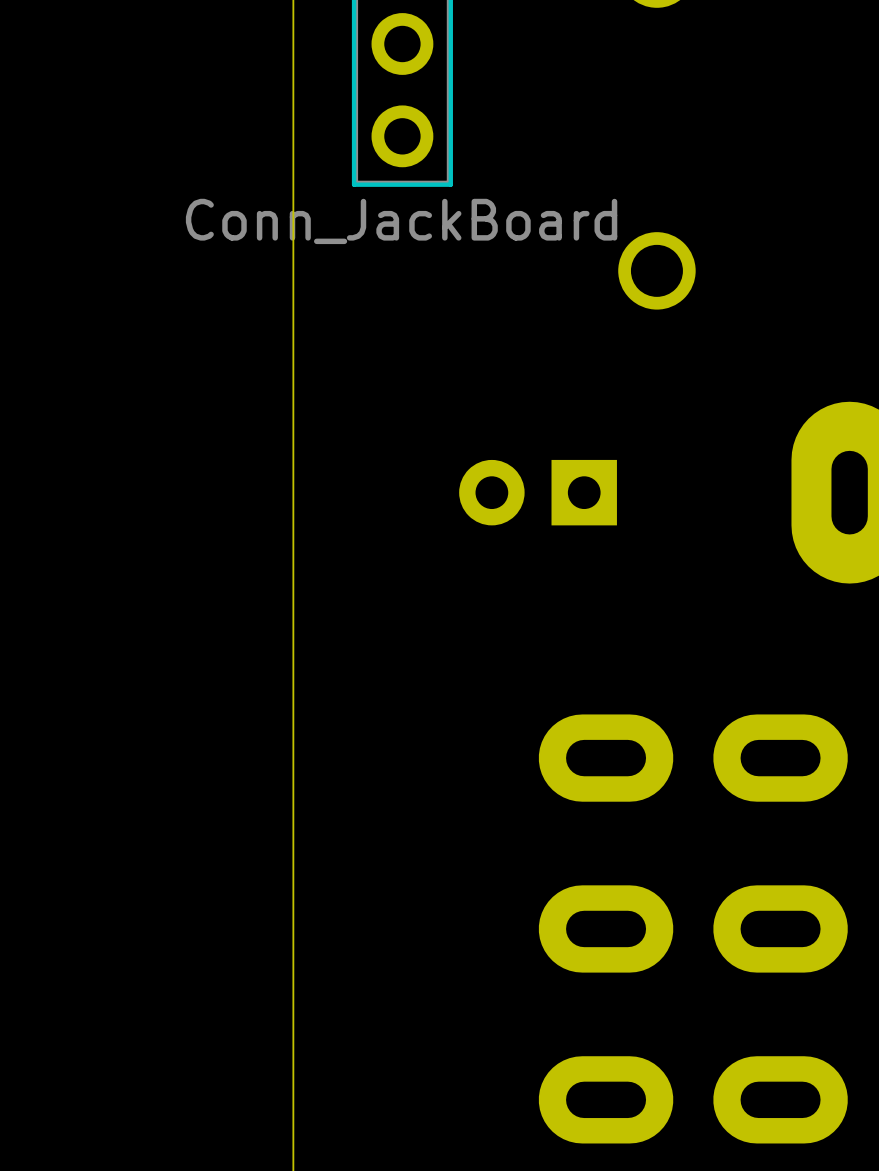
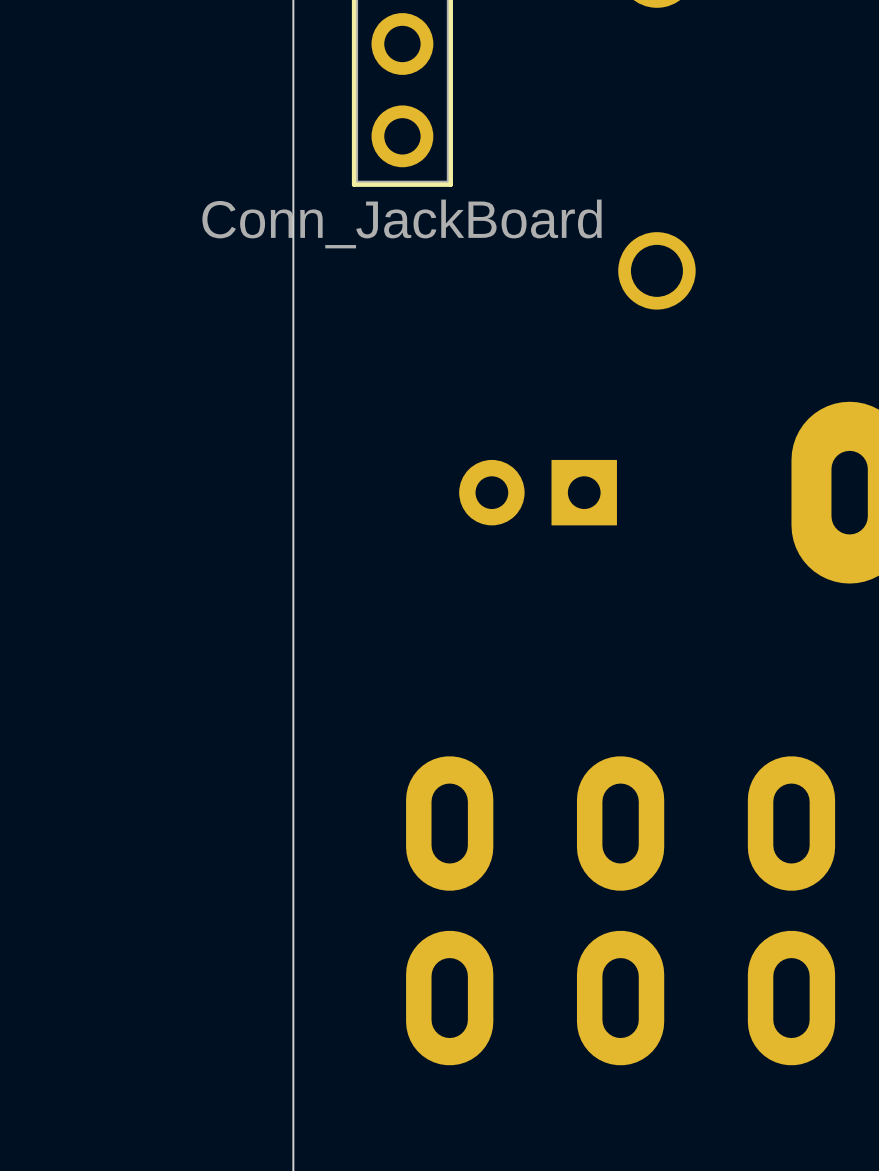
part rotation: 0° (693, 928) -> 90° clockwise (620, 910)

